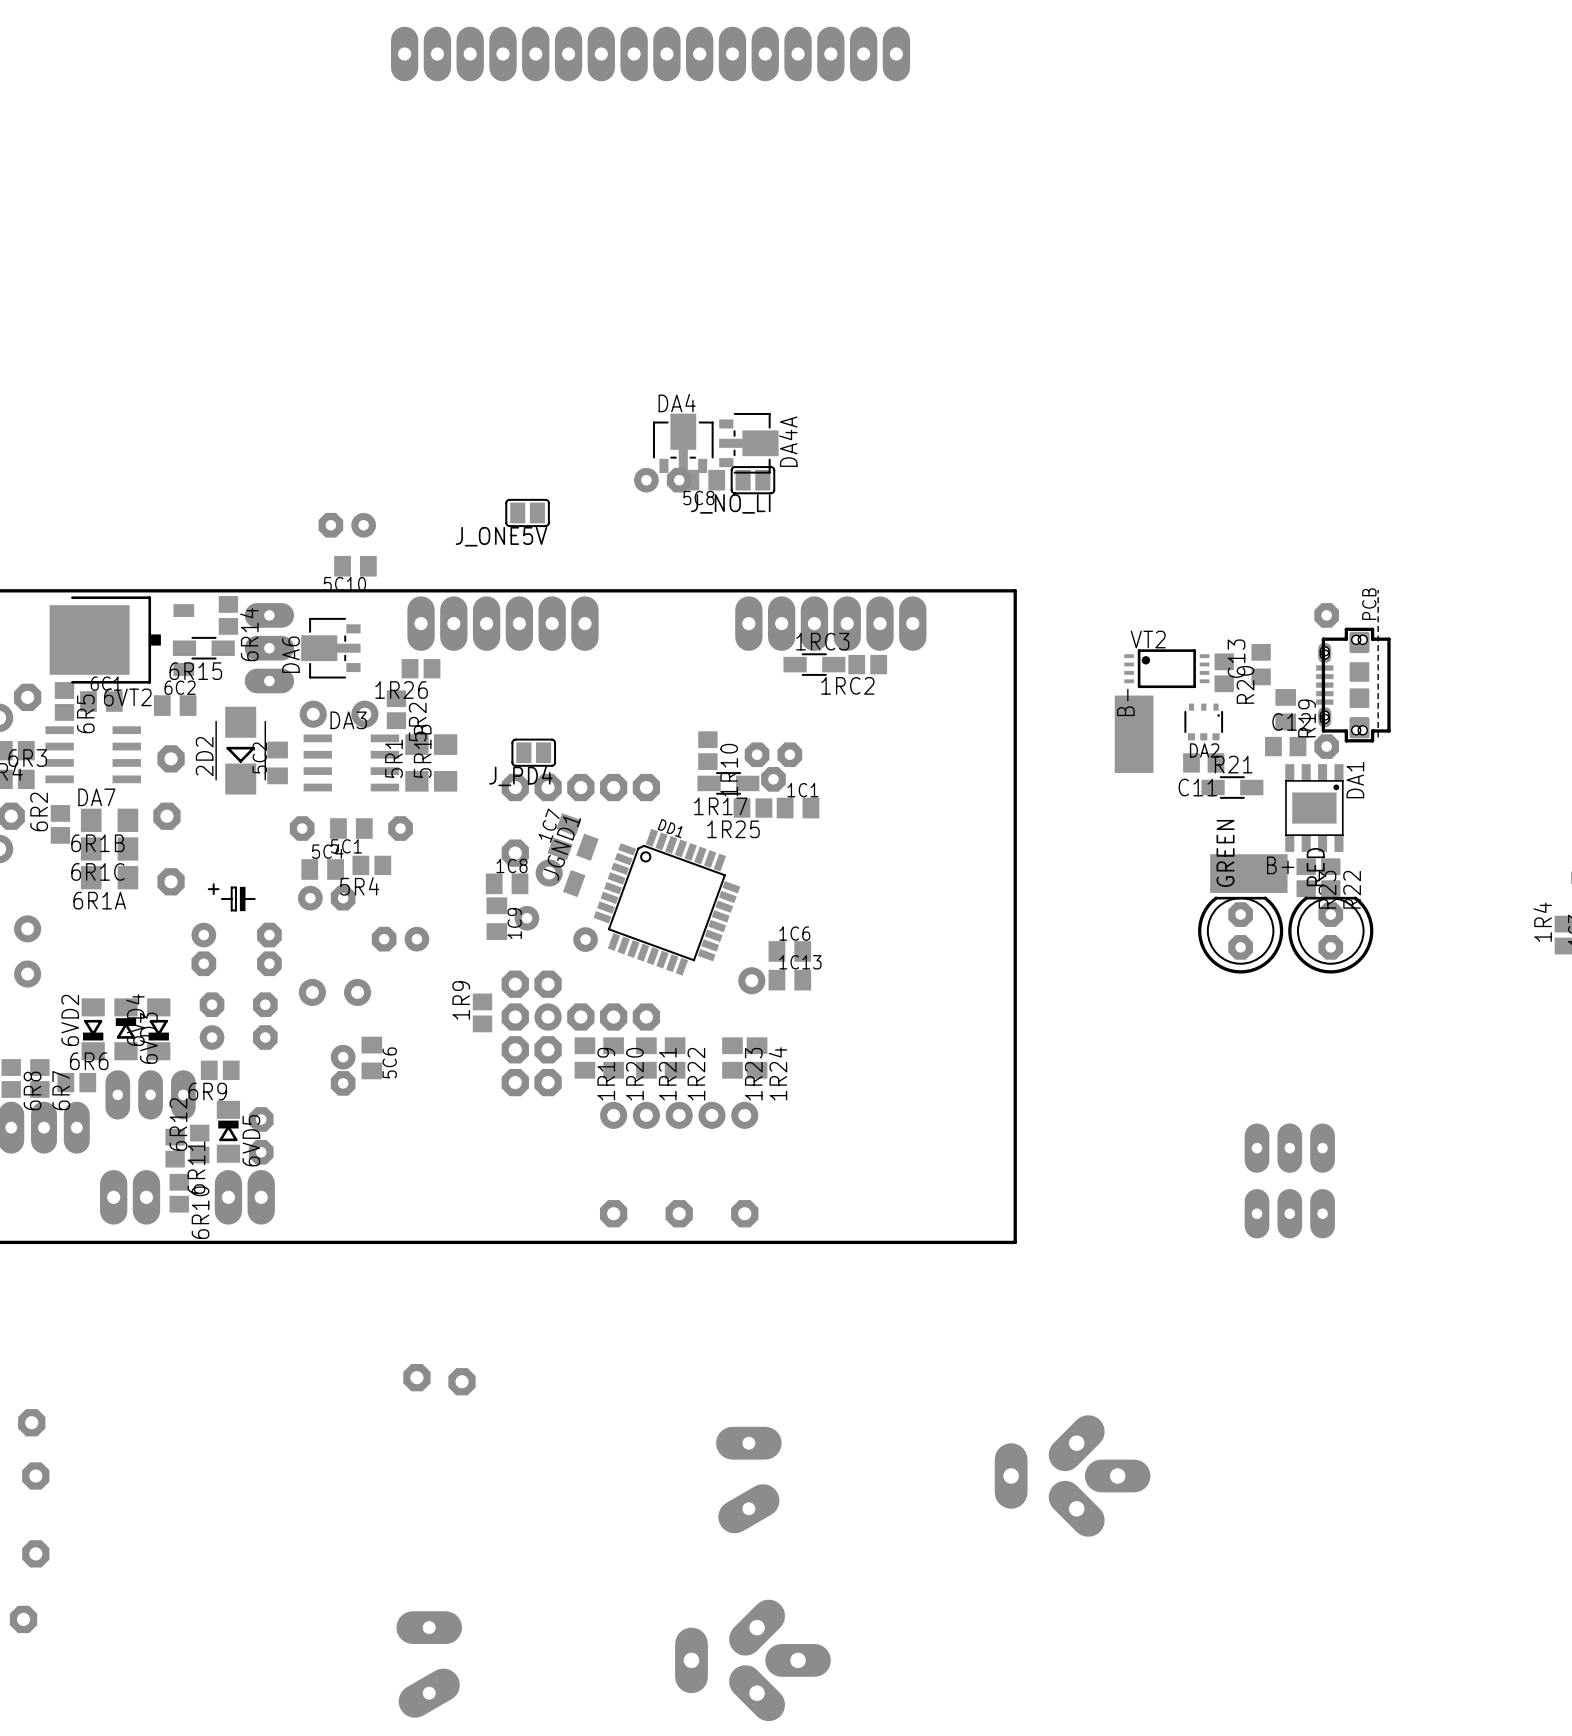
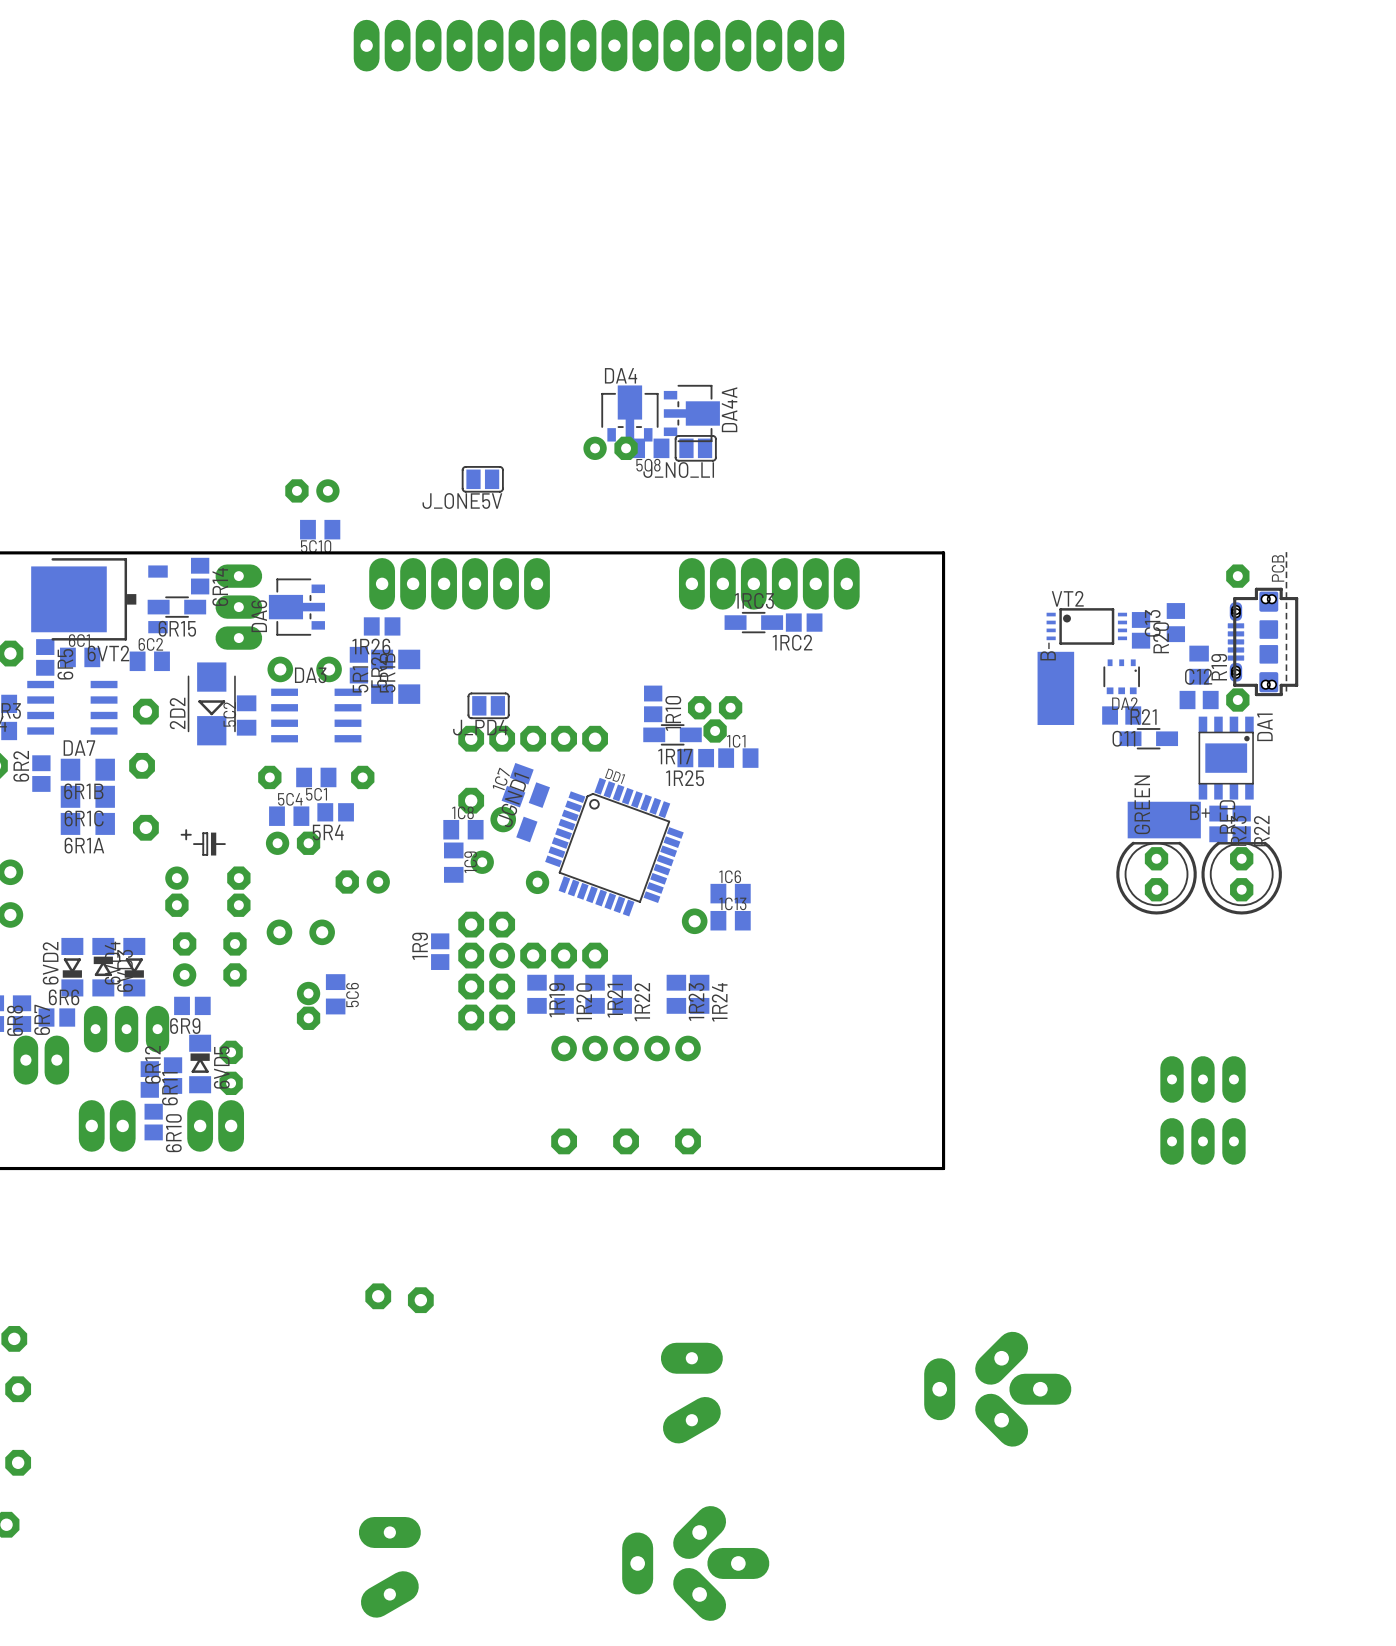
5R1 position: (416, 762) -> (382, 676)
5R1B position: (445, 762) -> (409, 676)

